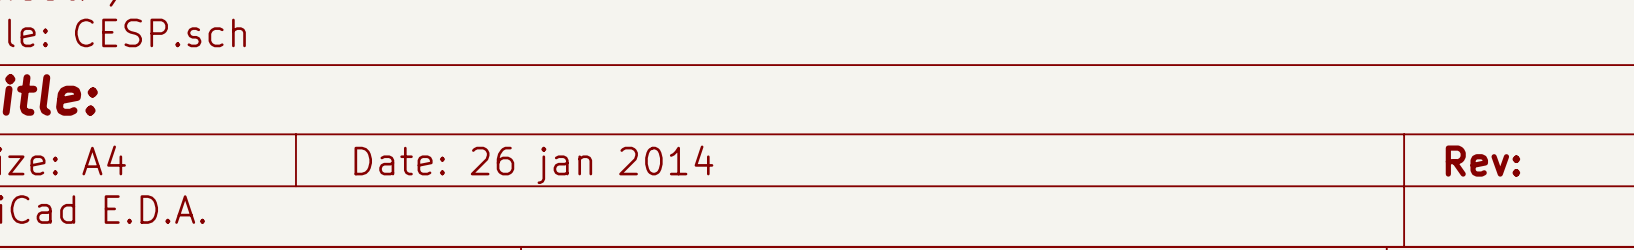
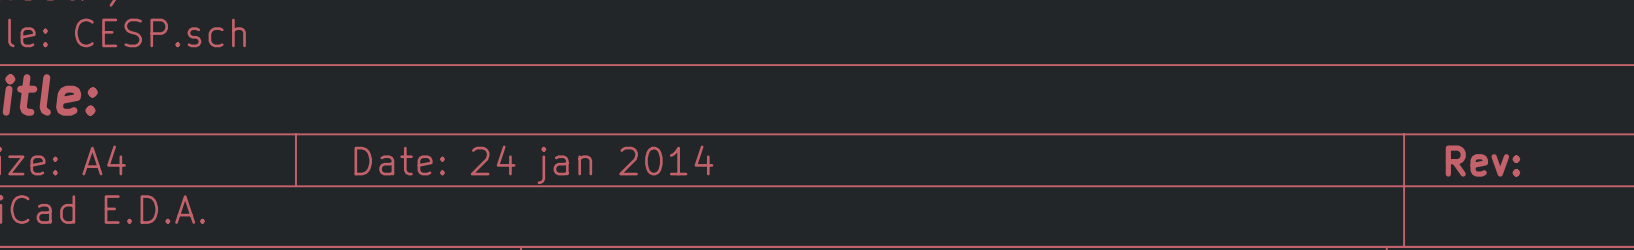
title block: Date: 26 jan 2014 (533, 164) -> Date: 24 jan 2014 (533, 164)

